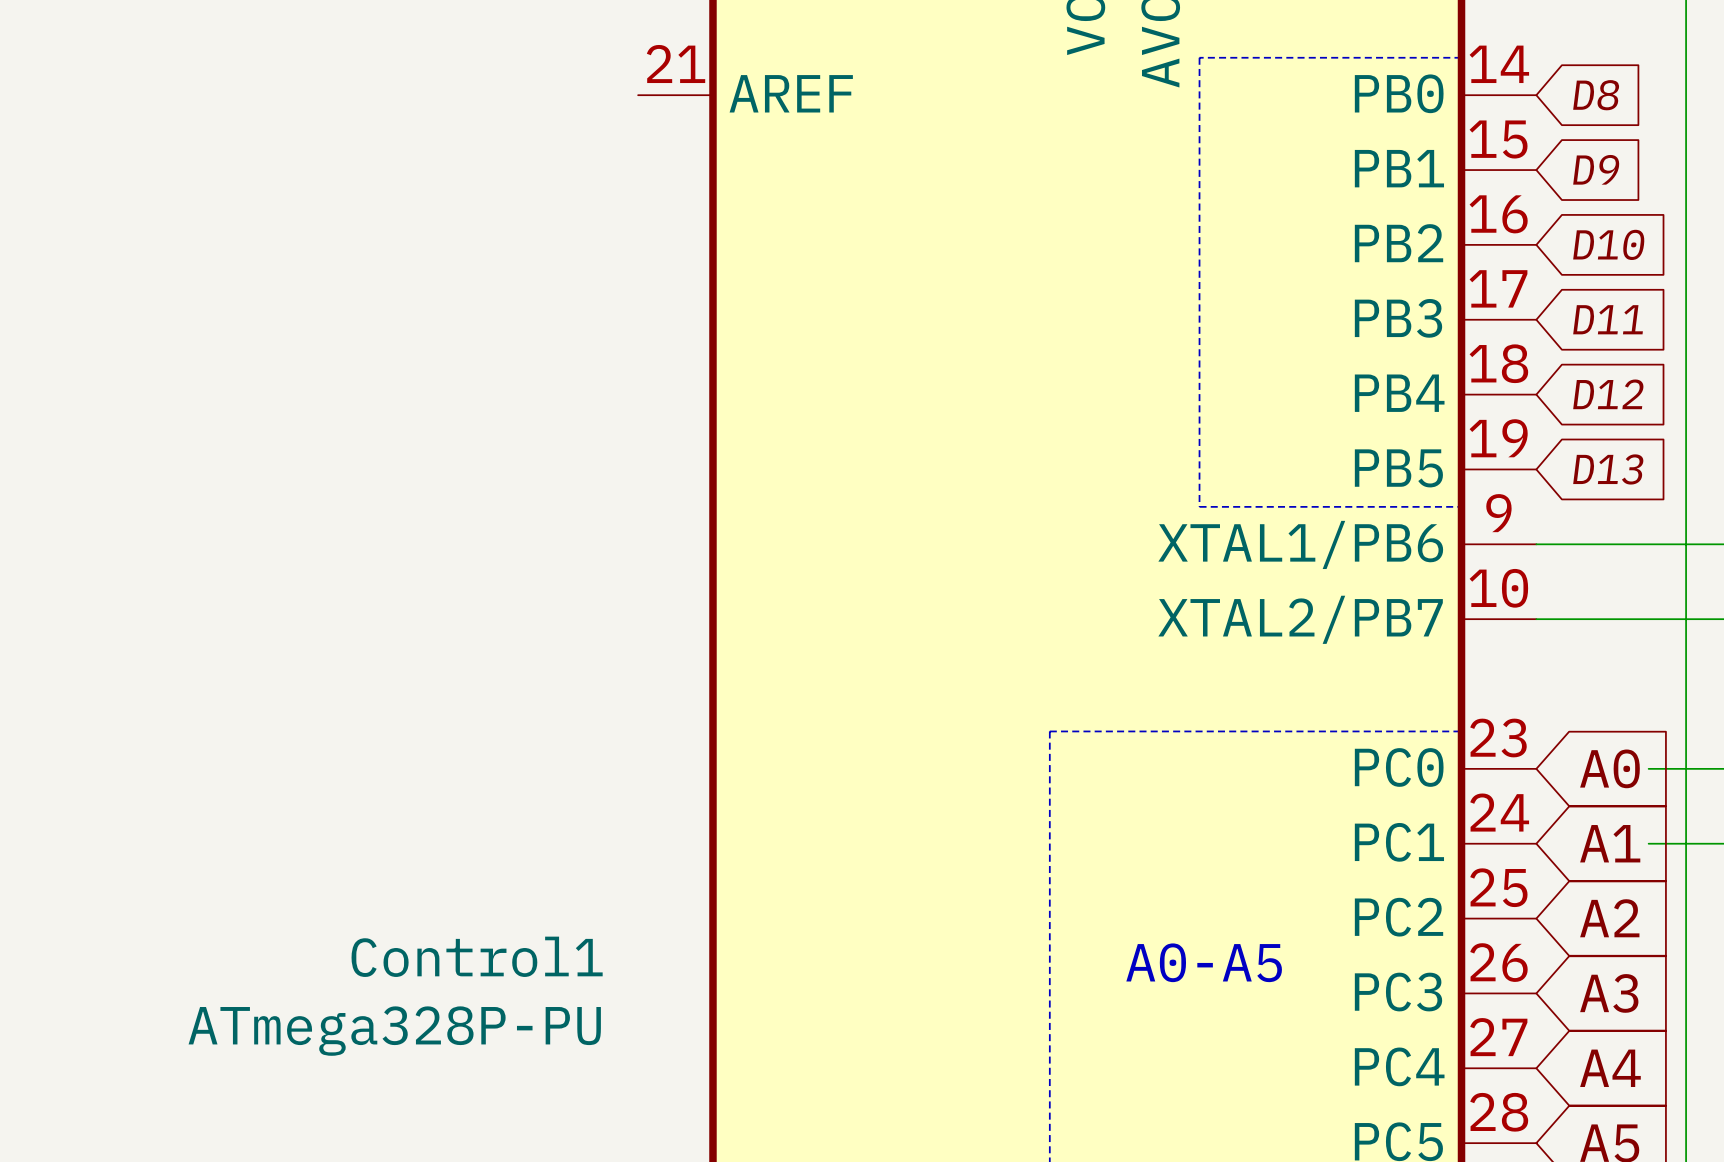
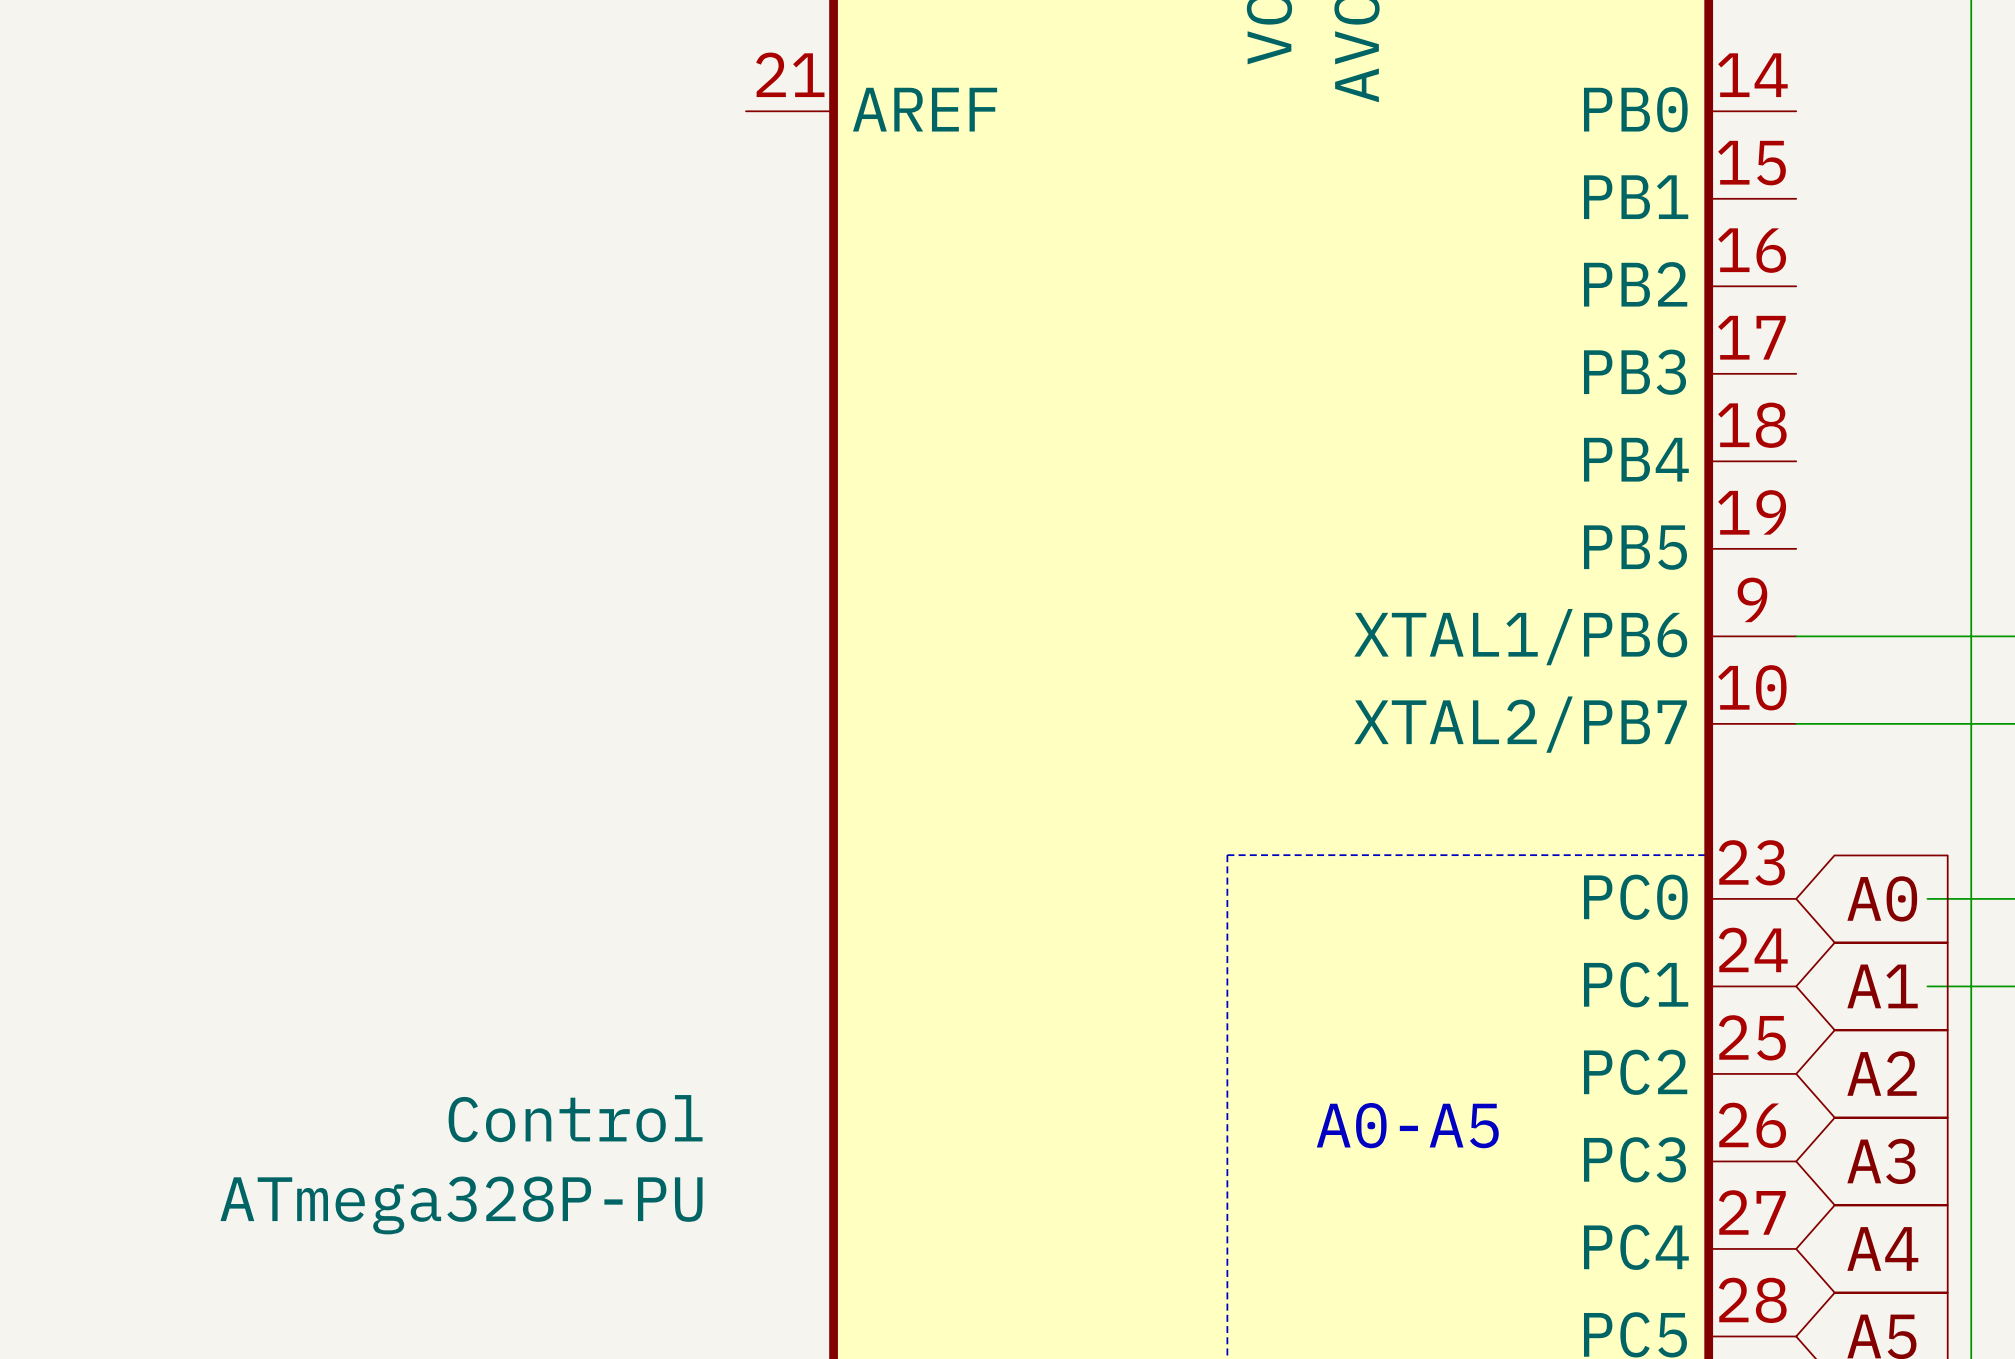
line: (1461, 57) (1199, 57) (1199, 506) (1461, 506) -> none
global label: D8 (1596, 95) -> none
global label: D9 (1596, 169) -> none
global label: D10 (1608, 244) -> none
global label: D11 (1608, 319) -> none
global label: D12 (1608, 394) -> none
global label: D13 (1608, 469) -> none
Control1 name: Control1 (477, 956) -> Control (575, 1118)

